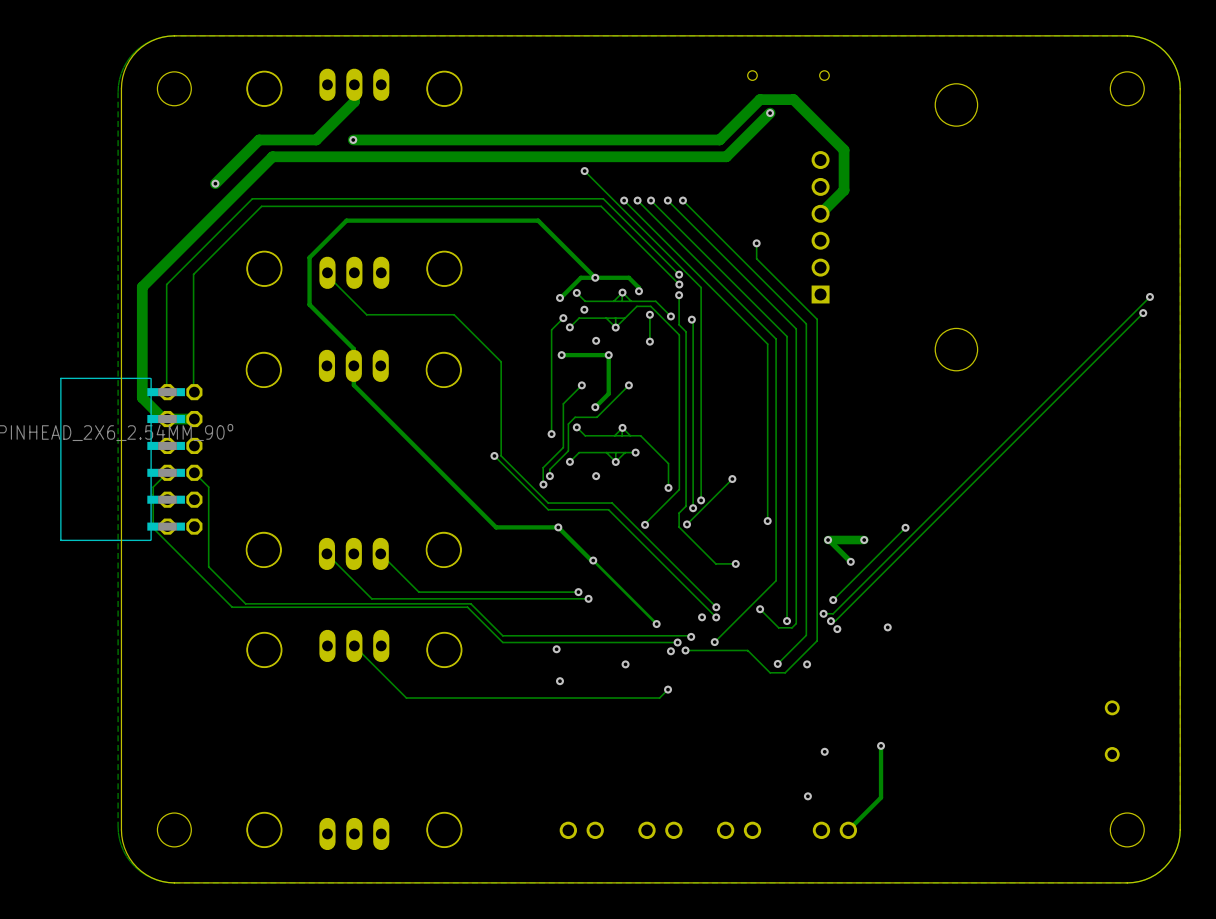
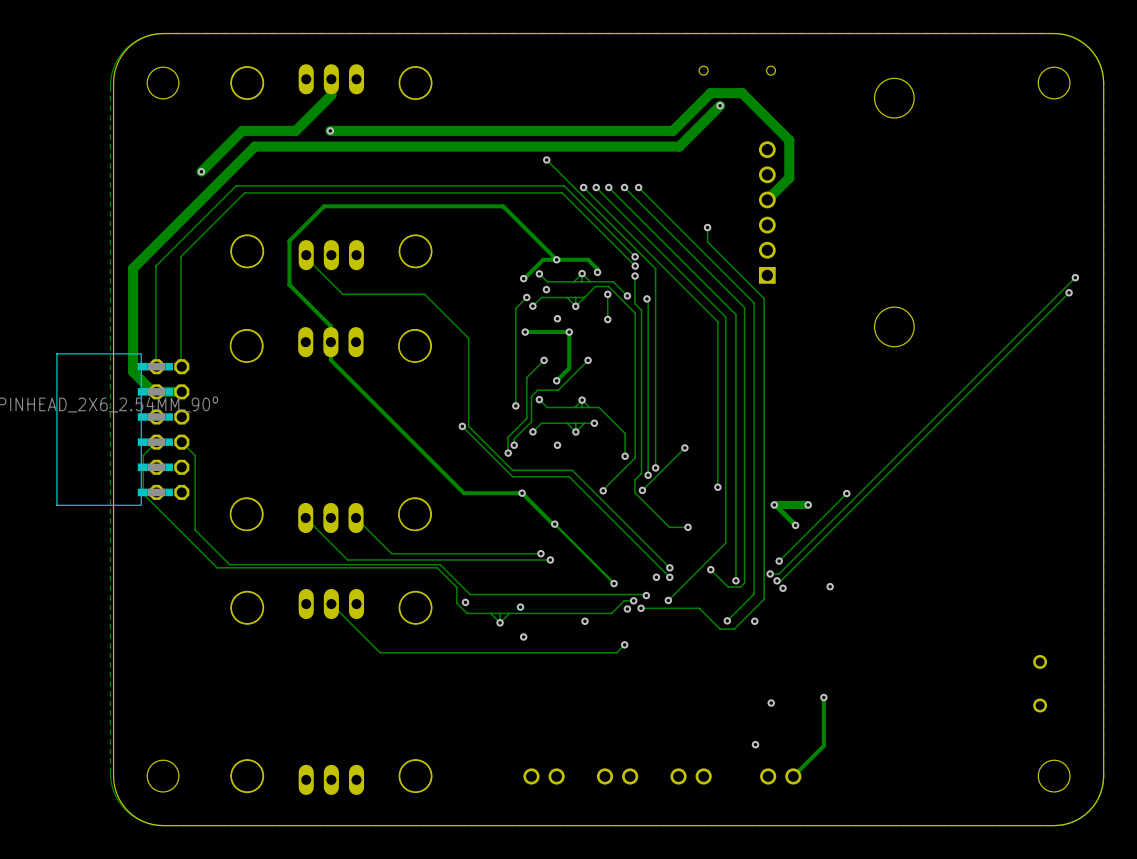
track: (488, 628) (502, 642) (667, 642) -> (456, 587) (456, 603) (467, 613) (611, 613) (624, 600)
via: none -> (465, 602)
track: none -> (490, 613) (500, 622)
track: none -> (500, 613) (500, 622)
track: none -> (509, 613) (500, 622)
via: none -> (500, 622)

